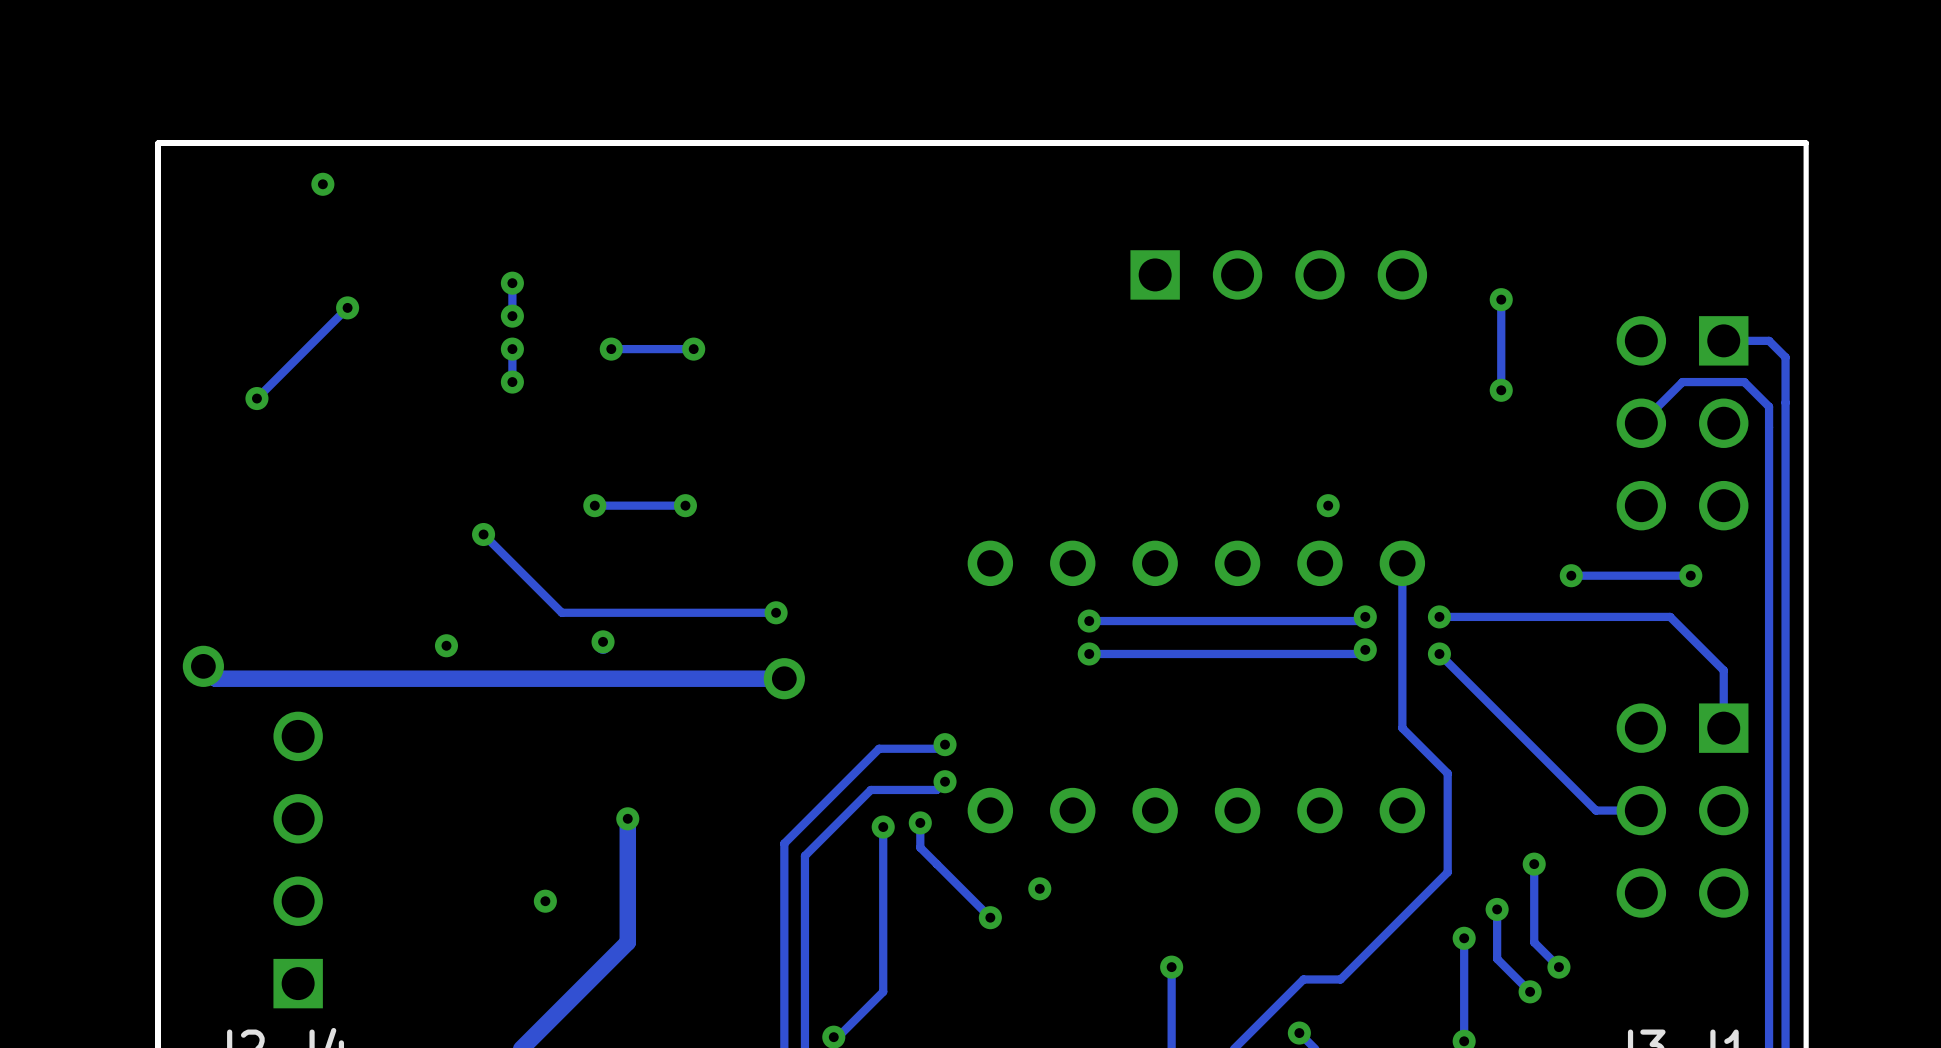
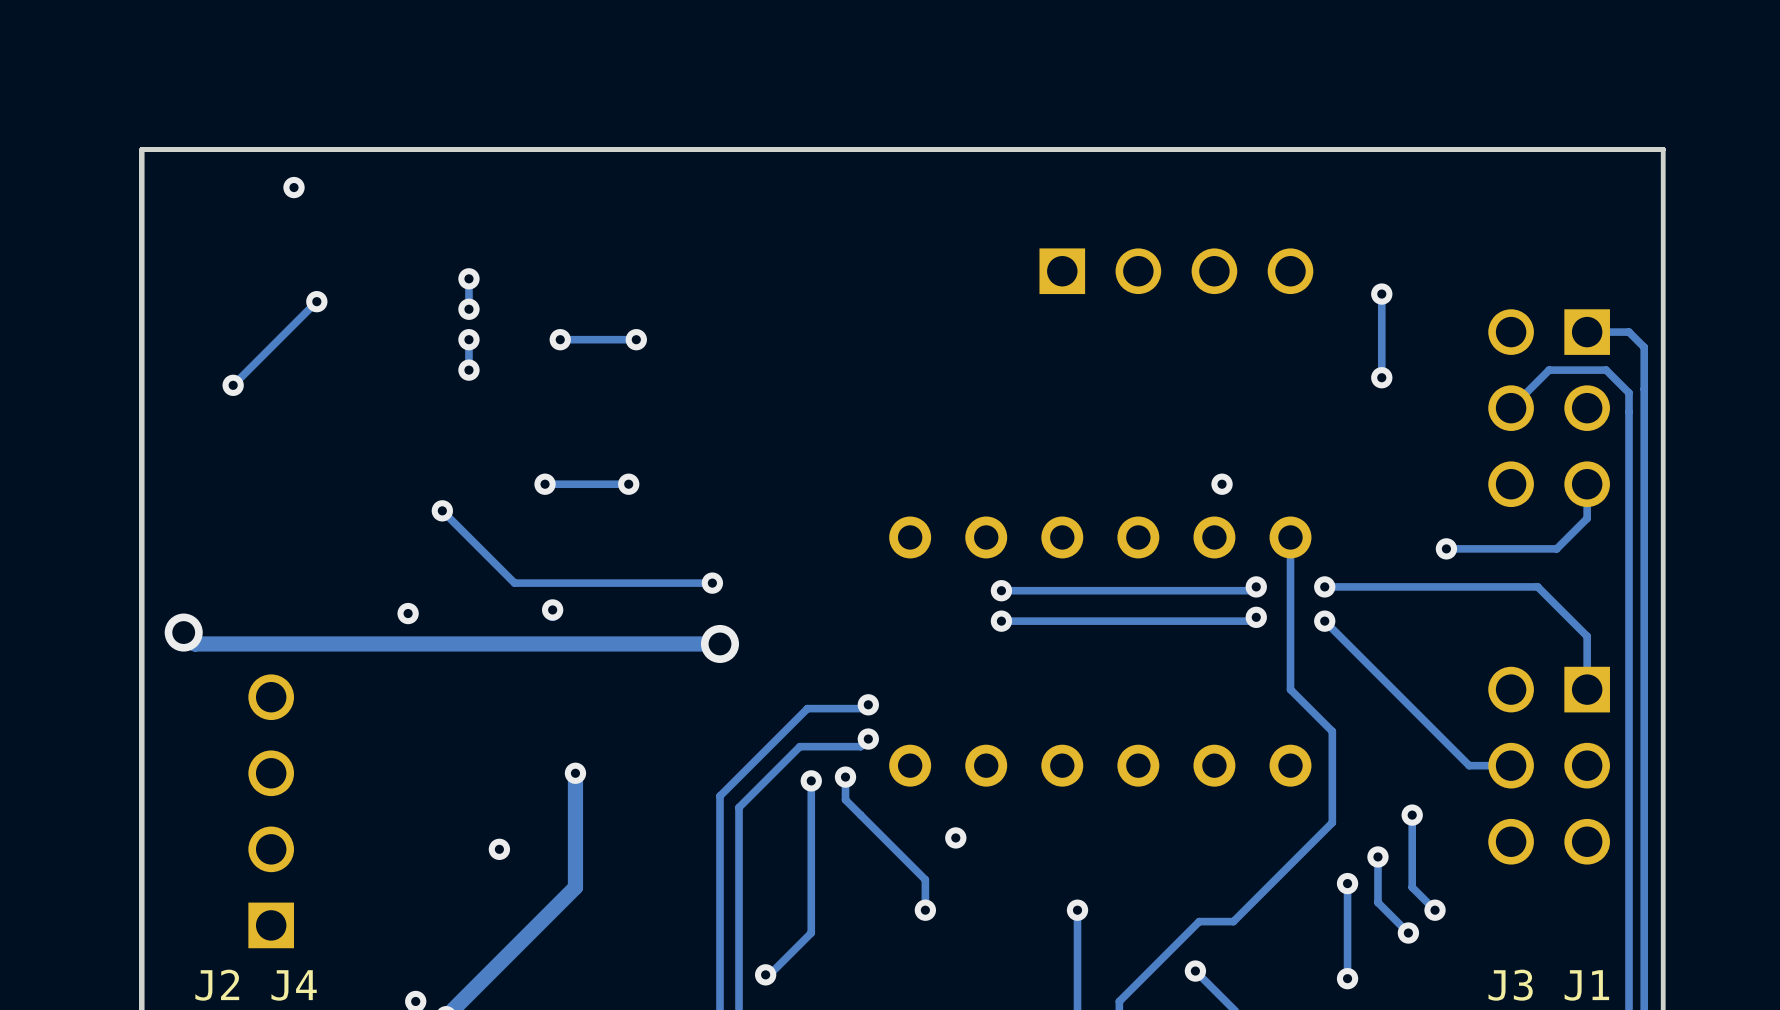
track: none -> (1587, 484) (1587, 518) (1556, 548)
via: (1690, 575) -> none
track: none -> (910, 864) (925, 879) (925, 910)
via position: (990, 917) -> (925, 910)

